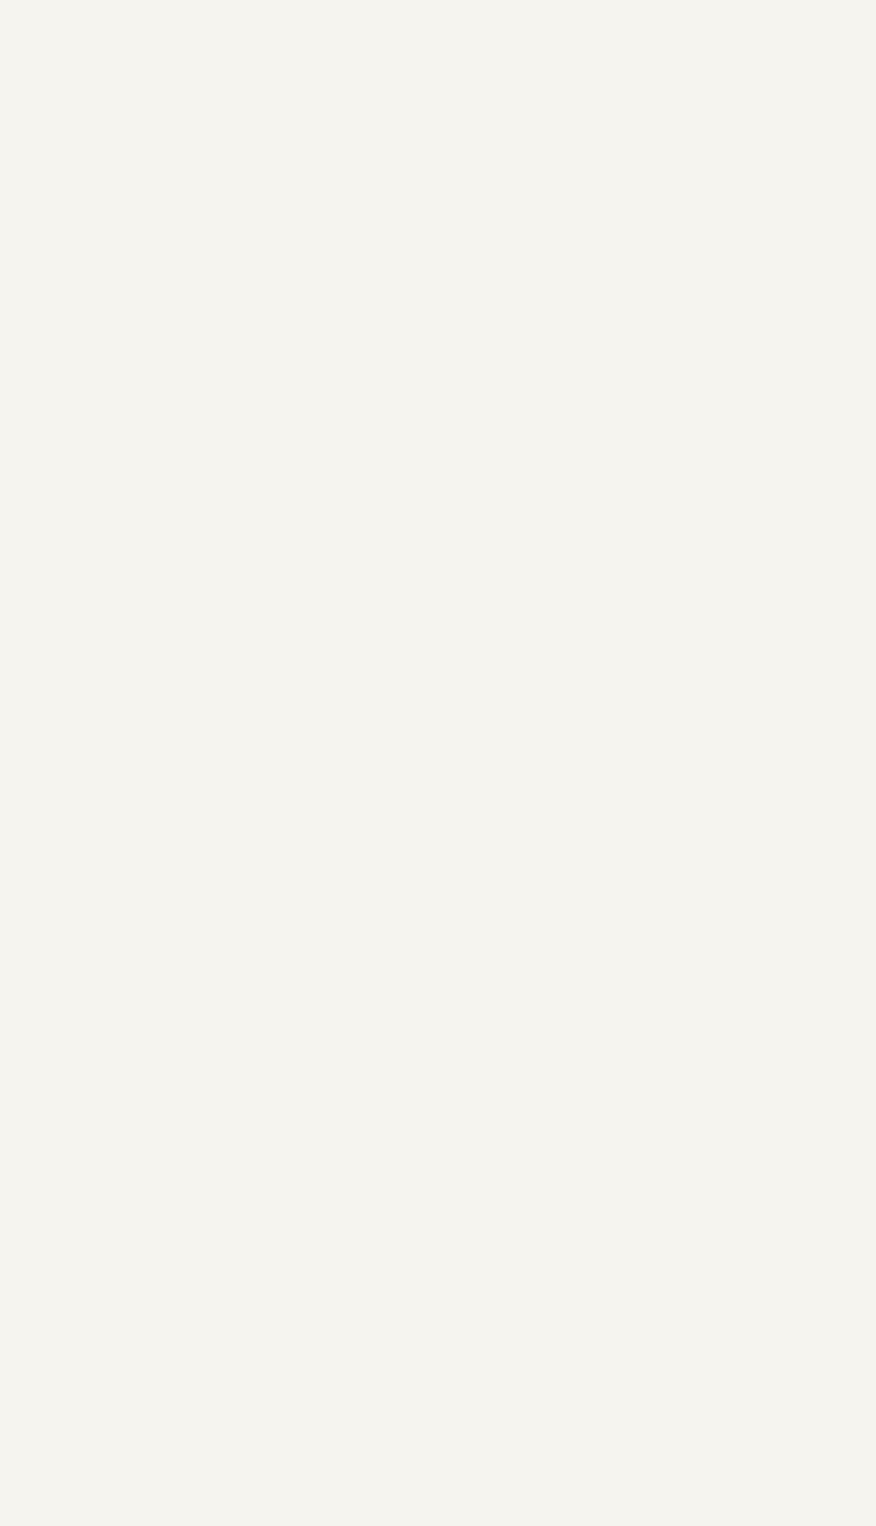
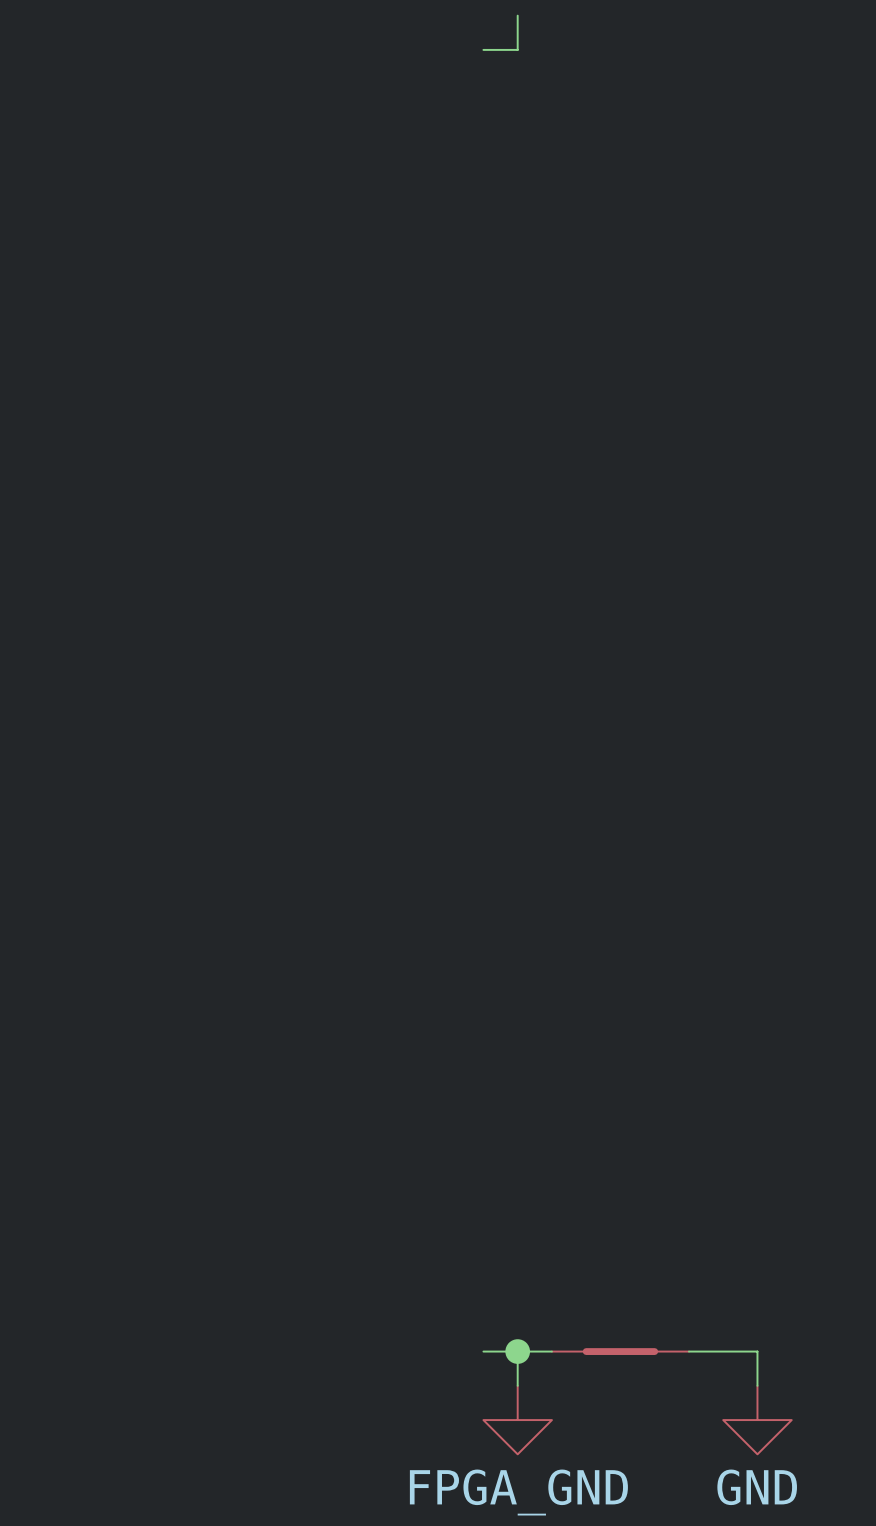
wire: none -> (517, 15) (517, 49) (483, 49)
wire: none -> (483, 1351) (551, 1351)
wire: none -> (517, 1351) (517, 1385)
junction: none -> (517, 1351)
part: none -> (620, 1351)
wire: none -> (688, 1351) (757, 1351) (757, 1385)
power symbol: none -> FPGA_GND (517, 1420)
power symbol: none -> GND (757, 1420)

